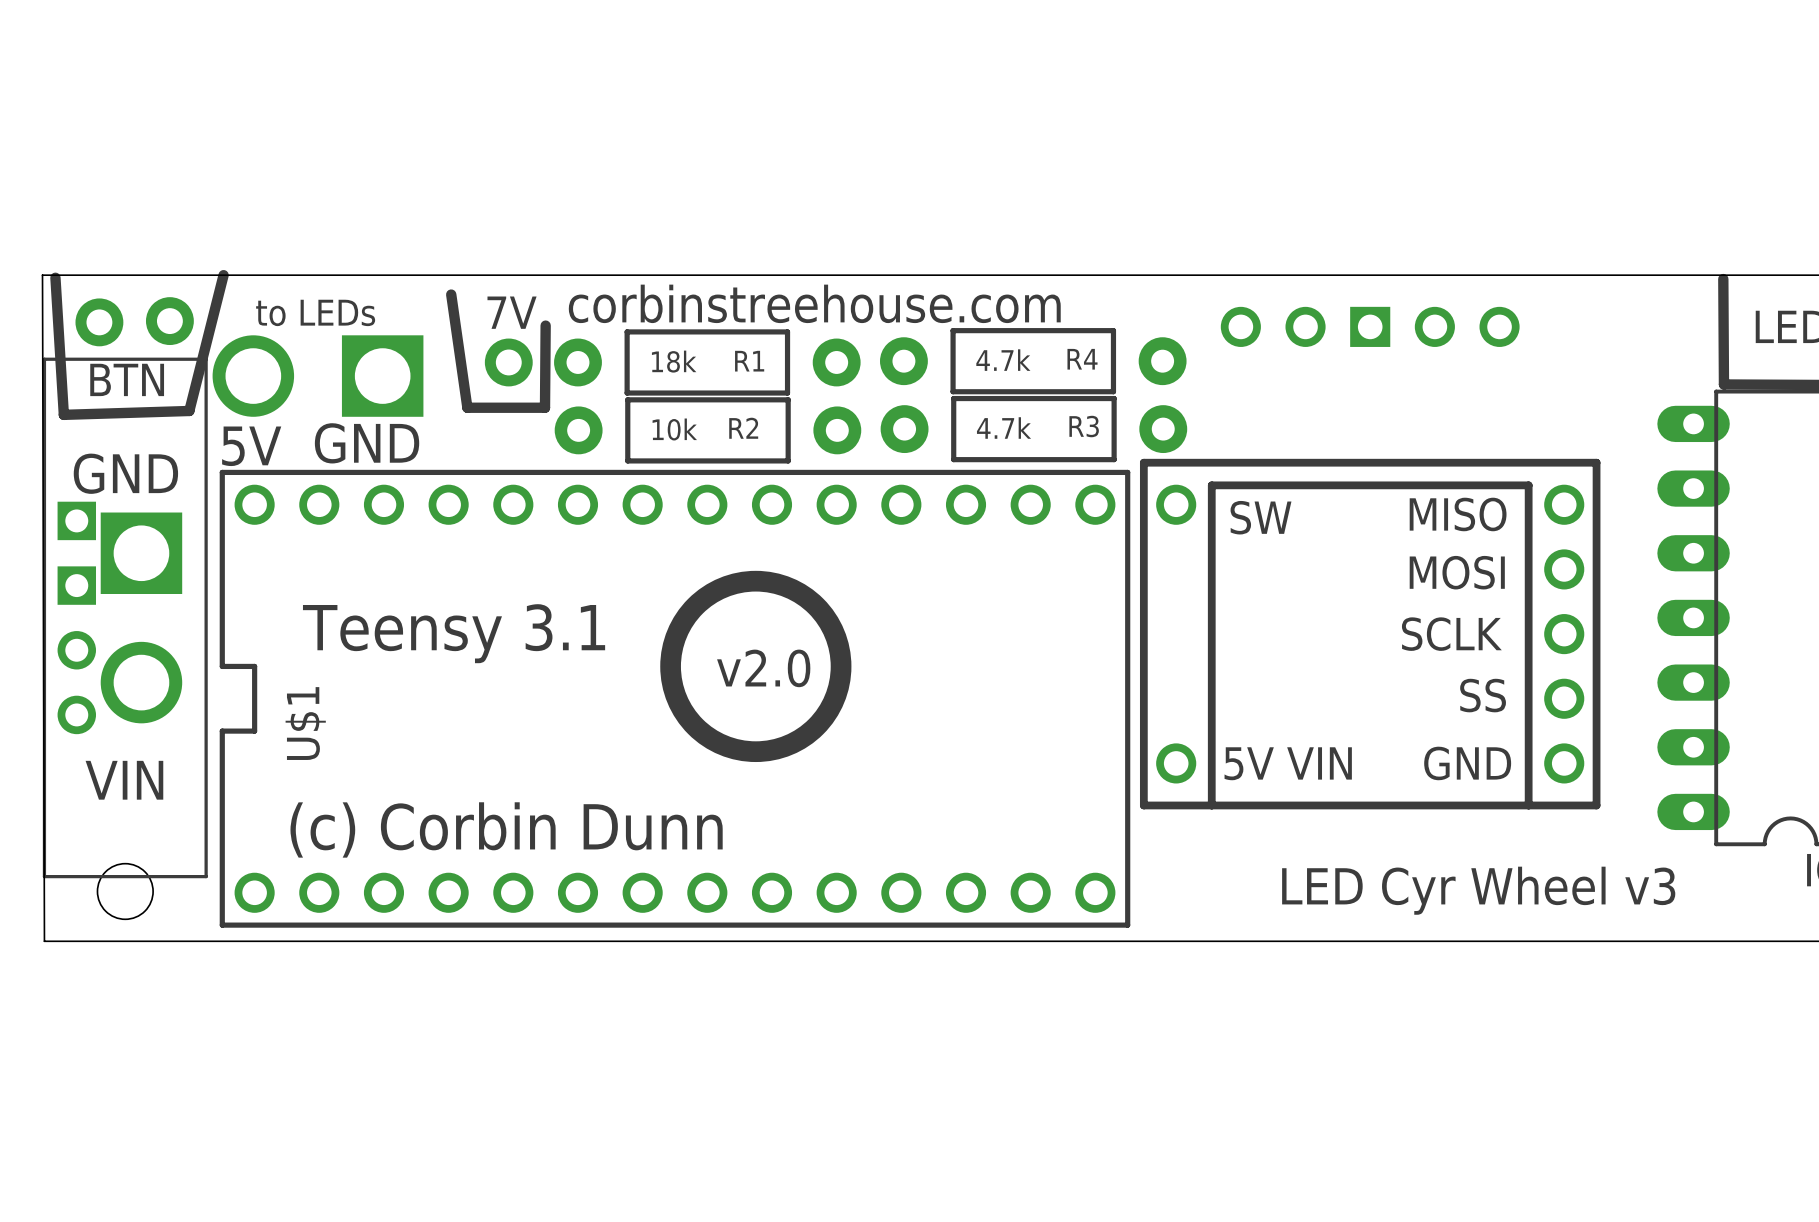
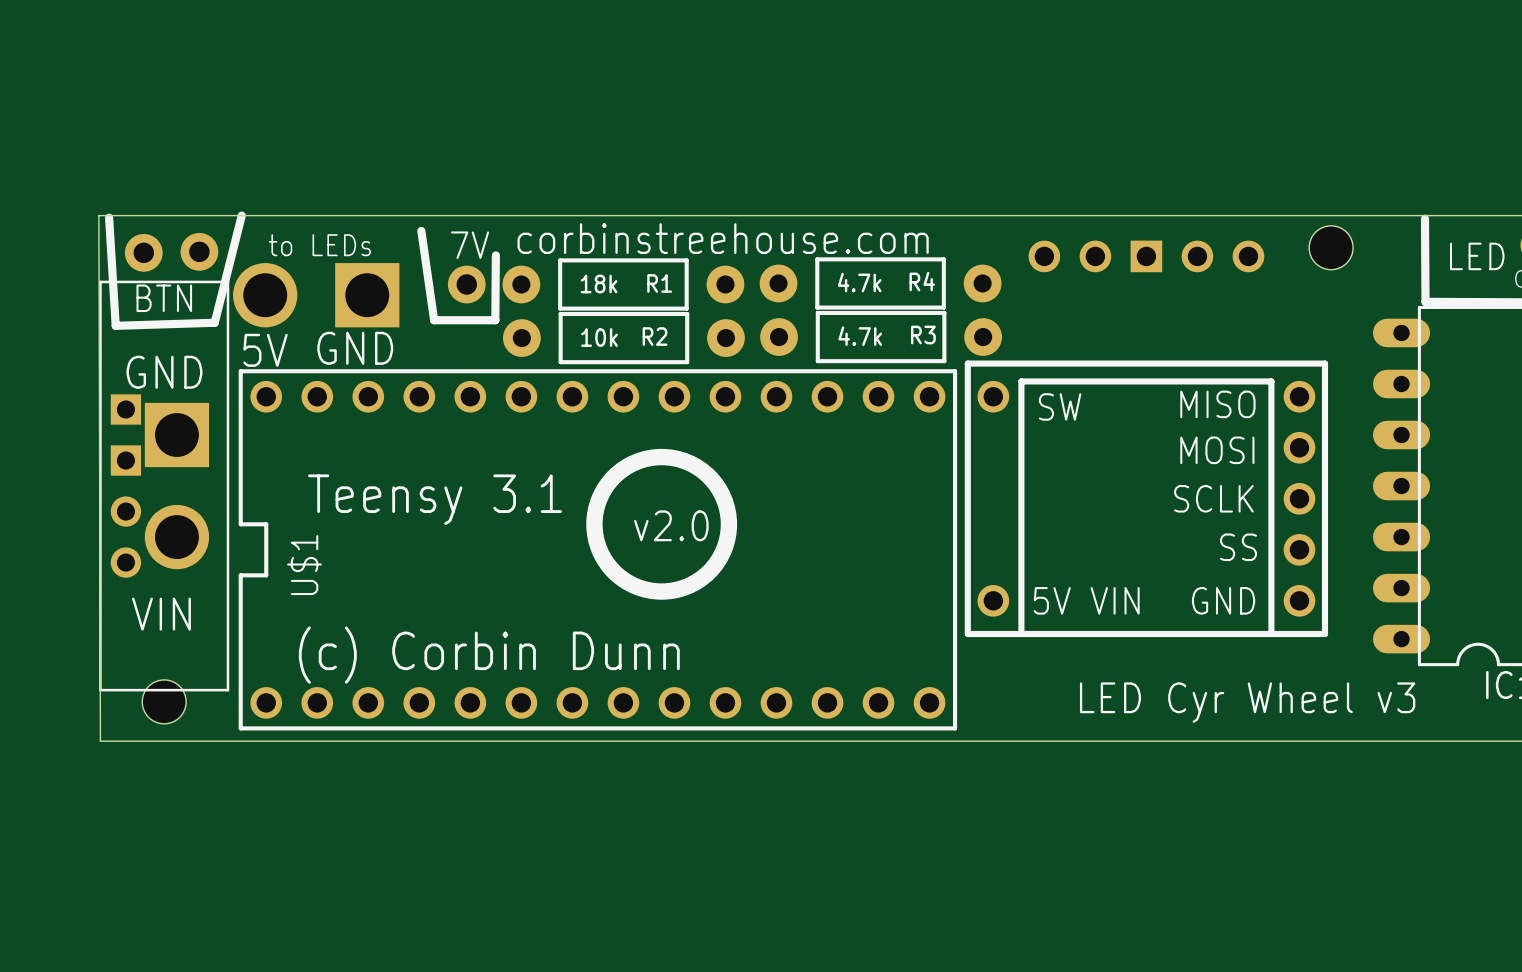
hole: none -> (1331, 247)

